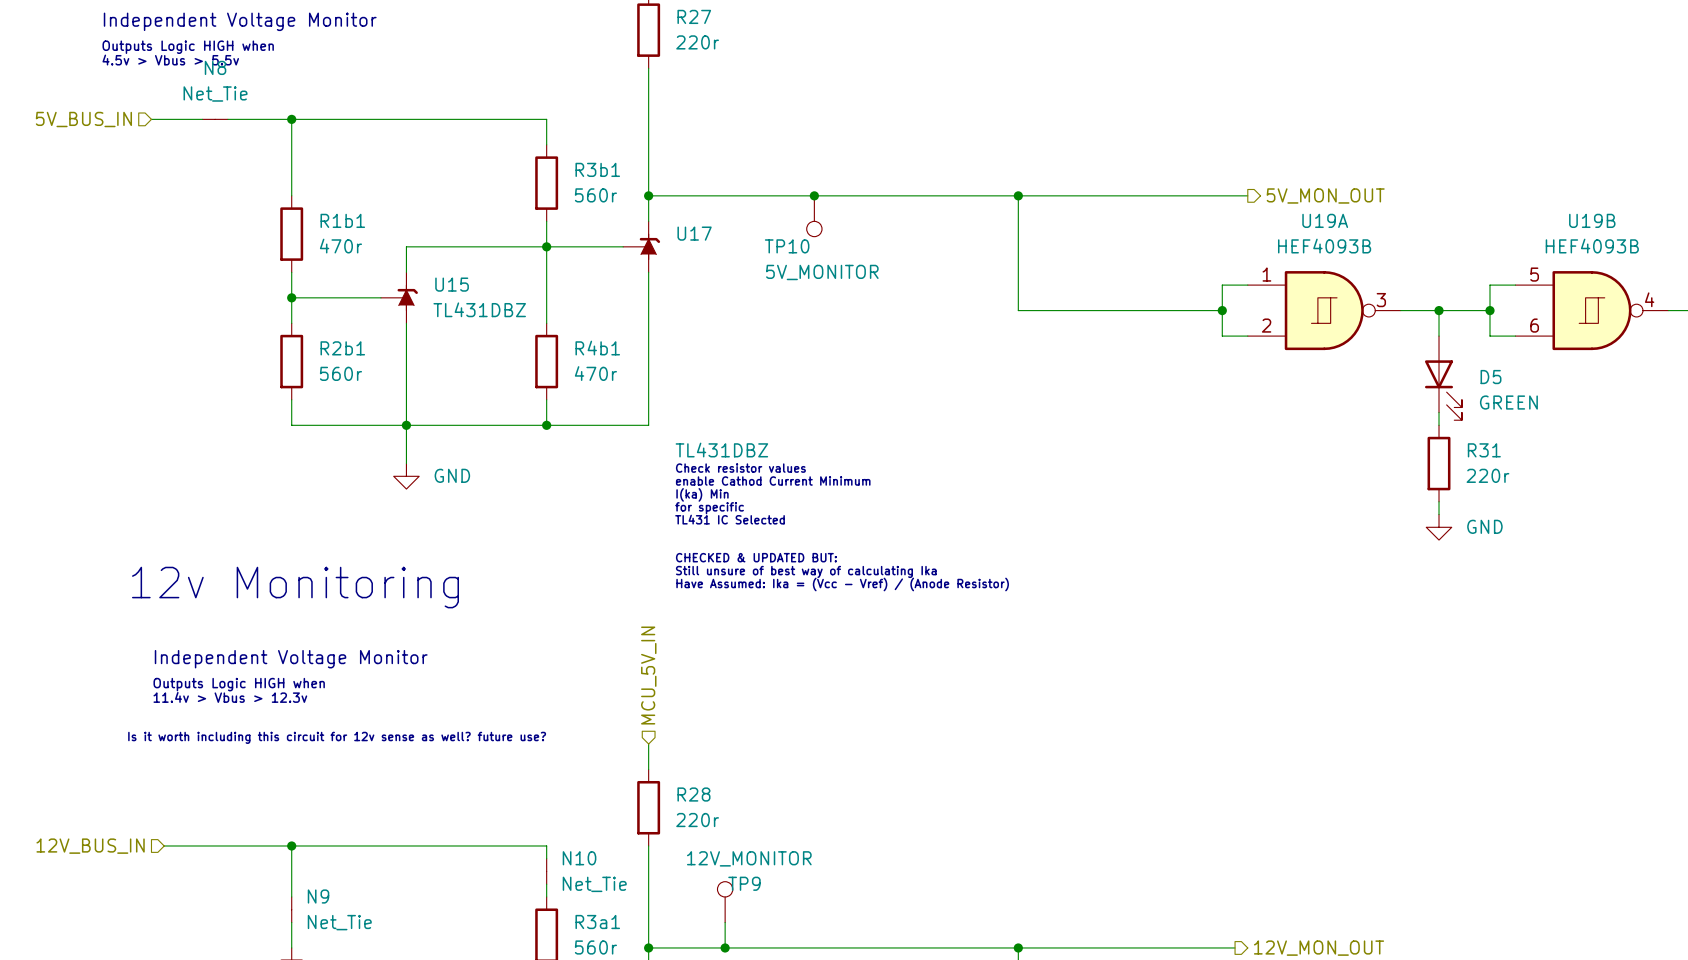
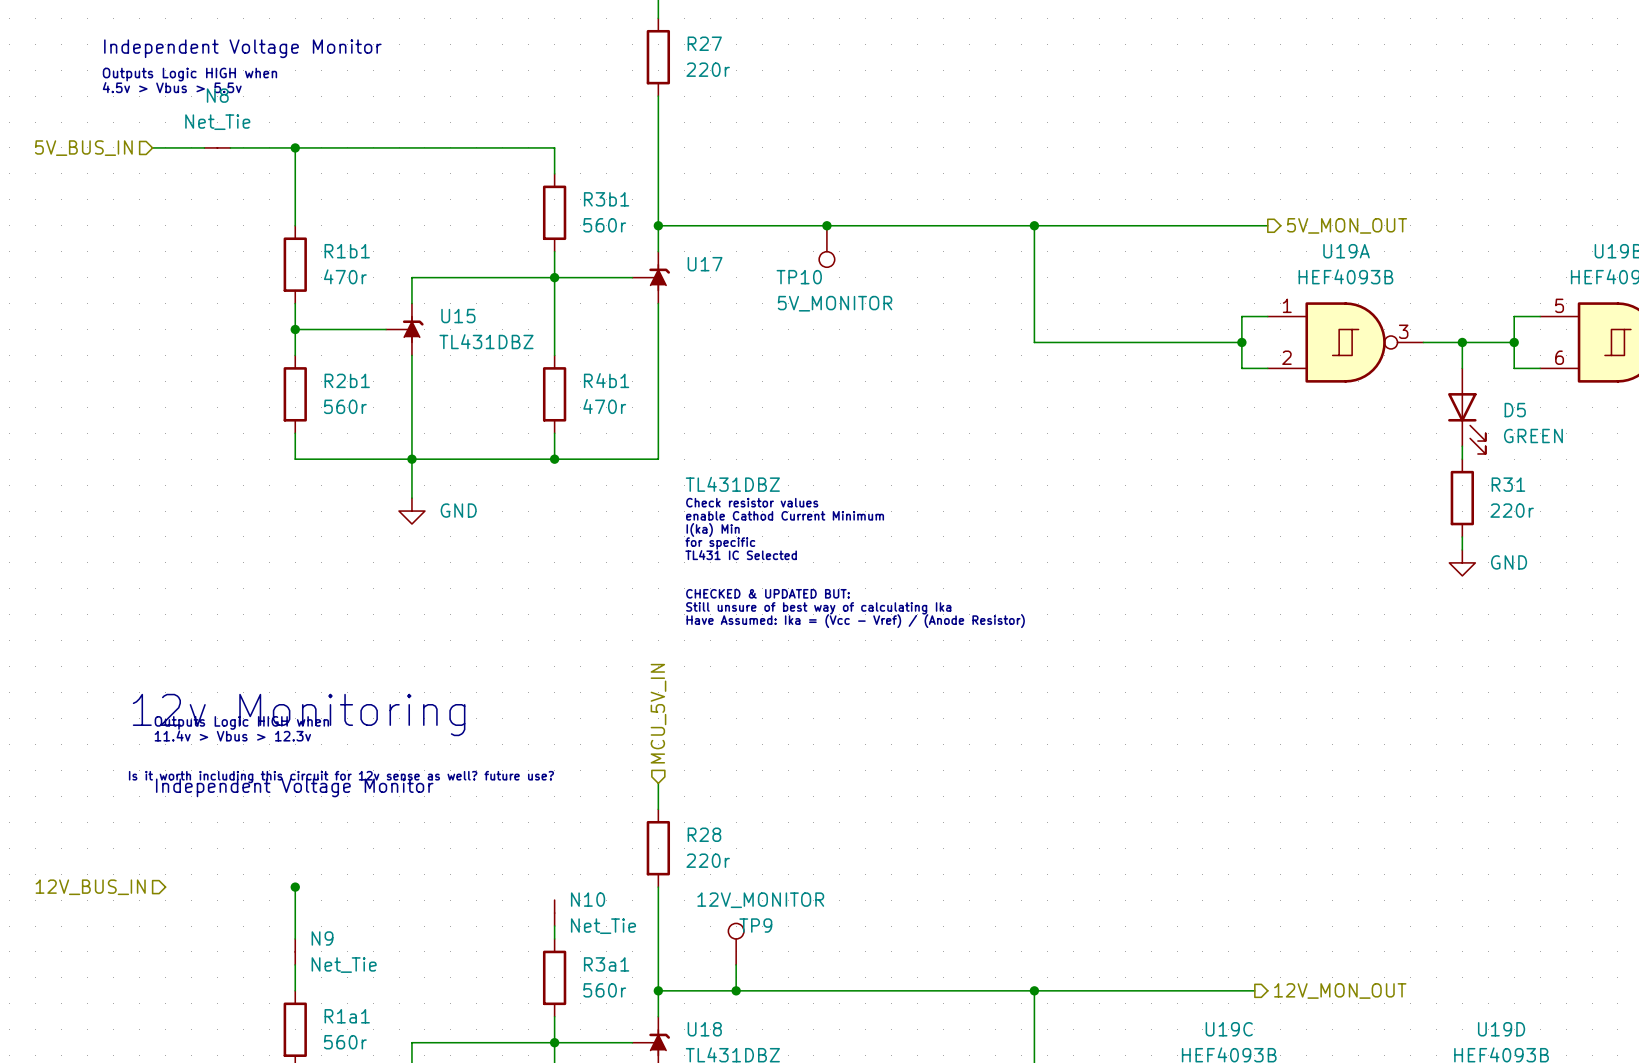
text position: 12v Monitoring (295, 587) -> 12v Monitoring (299, 714)
text position: Independent Voltage Monitor (291, 659) -> Independent Voltage Monitor (294, 787)
wire: (164, 845) (546, 845) (546, 858) -> none

